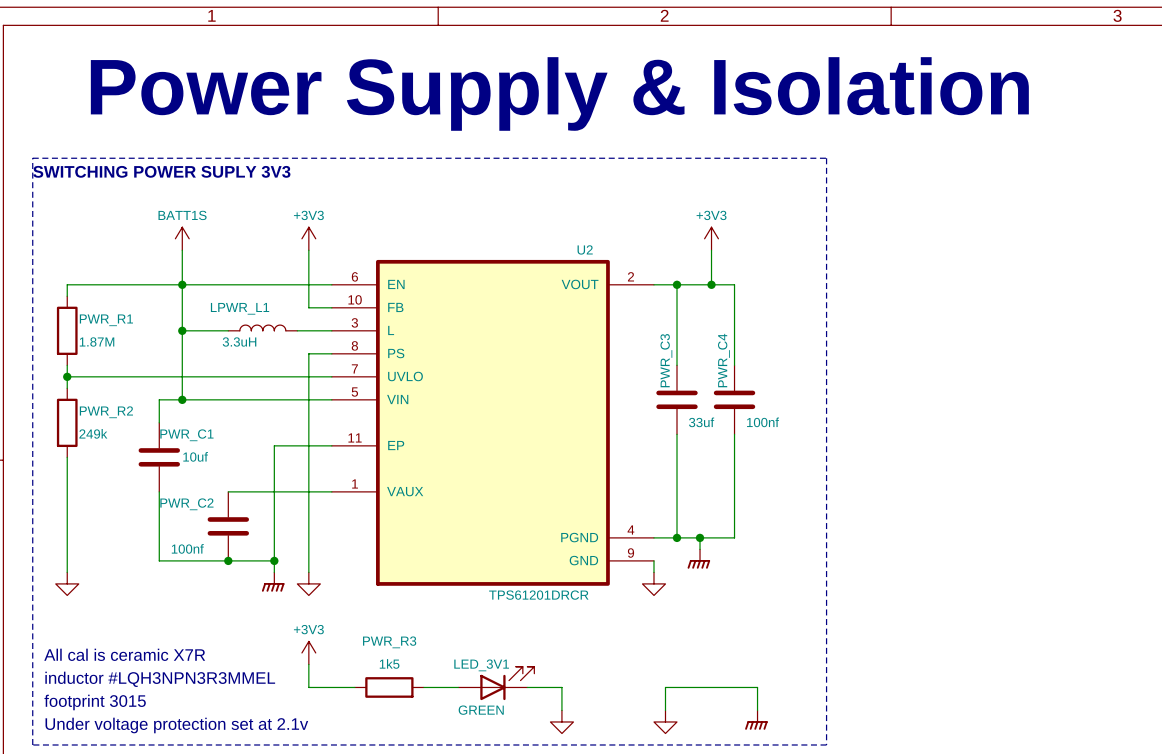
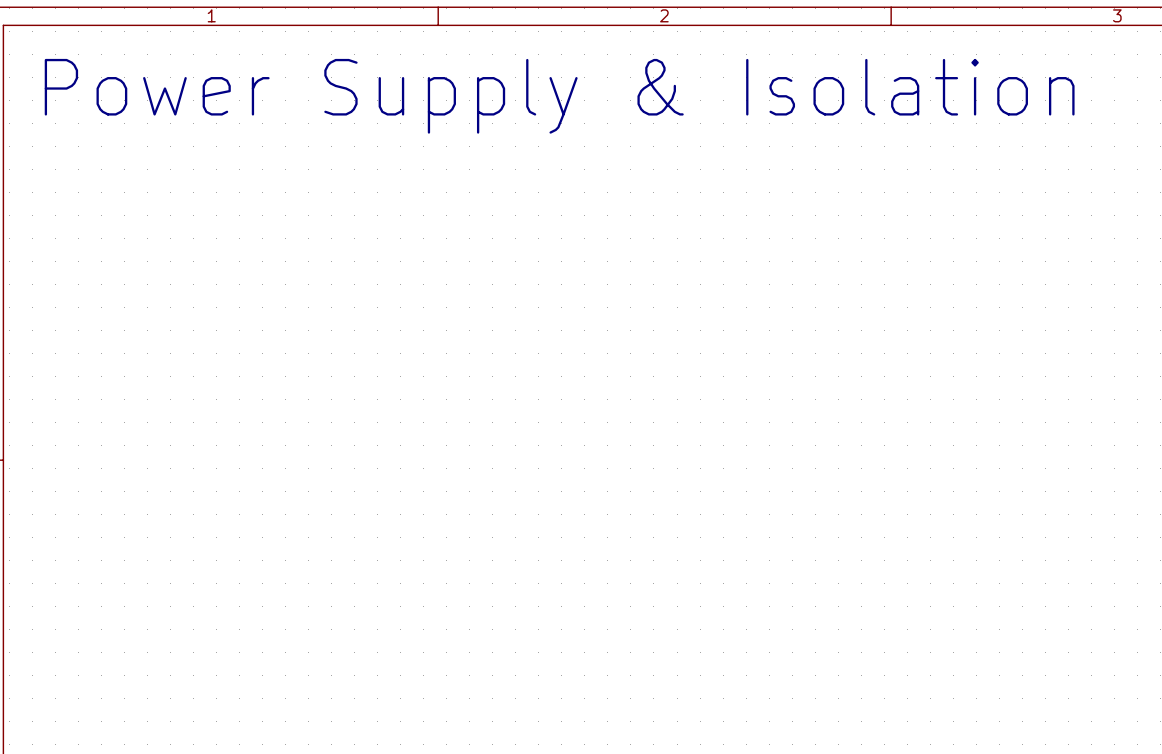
line: (32, 158) (826, 158) (826, 744) (32, 744) (32, 158) -> none
text: SWITCHING POWER SUPLY 3V3 (161, 171) -> none
power symbol: BATT1S (182, 238) -> none
power symbol: +3V3 (308, 238) -> none
power symbol: +3V3 (711, 238) -> none
wire: (182, 250) (182, 399) -> none
wire: (308, 250) (308, 307) (331, 307) -> none
wire: (711, 250) (711, 284) -> none
junction: (182, 284) -> none
wire: (331, 284) (67, 284) (67, 296) -> none
wire: (653, 284) (734, 284) (734, 365) -> none
wire: (677, 284) (677, 365) -> none
junction: (677, 284) -> none
junction: (711, 284) -> none
LPWR_L1: 3.3uH (262, 327) -> none
PWR_R1: 1.87M (67, 330) -> none
wire: (182, 330) (228, 330) -> none
junction: (182, 330) -> none
wire: (297, 330) (331, 330) -> none
wire: (331, 353) (308, 353) (308, 572) -> none
wire: (67, 365) (67, 388) -> none
wire: (67, 376) (331, 376) -> none
junction: (67, 376) -> none
junction: (182, 399) -> none
wire: (331, 399) (159, 399) (159, 422) -> none
PWR_C3: 33uf (677, 399) -> none
PWR_C4: 100nf (734, 399) -> none
PWR_R2: 249k (67, 422) -> none
U2: TPS61201DRCR (492, 422) -> none
wire: (677, 434) (677, 537) -> none
wire: (734, 434) (734, 537) (653, 537) -> none
wire: (331, 445) (274, 445) (274, 572) -> none
wire: (67, 457) (67, 572) -> none
PWR_C1: 10uf (159, 457) -> none
wire: (159, 491) (159, 560) (274, 560) -> none
wire: (228, 491) (331, 491) -> none
PWR_C2: 100nf (228, 526) -> none
junction: (677, 537) -> none
wire: (700, 537) (700, 549) -> none
junction: (700, 537) -> none
power symbol: (698, 559) -> none
junction: (228, 560) -> none
junction: (274, 560) -> none
wire: (653, 560) (653, 572) -> none
power symbol: (273, 582) -> none
power symbol: (67, 583) -> none
power symbol: (308, 583) -> none
power symbol: (653, 583) -> none
power symbol: +3V3 (308, 652) -> none
text: All cal is ceramic X7R (124, 654) -> none
wire: (308, 664) (308, 687) (354, 687) -> none
text: inductor #LQH3NPN3R3MMEL (160, 679) -> none
LED_3V1: GREEN (496, 683) -> none
PWR_R3: 1k5 (389, 687) -> none
wire: (423, 687) (458, 687) -> none
wire: (527, 687) (561, 687) (561, 710) -> none
text: footprint 3015 (95, 702) -> none
wire: (665, 710) (665, 687) (757, 687) (757, 710) -> none
power symbol: (756, 720) -> none
power symbol: (561, 721) -> none
power symbol: (665, 721) -> none
text: Under voltage protection set at 2.1v (176, 725) -> none

